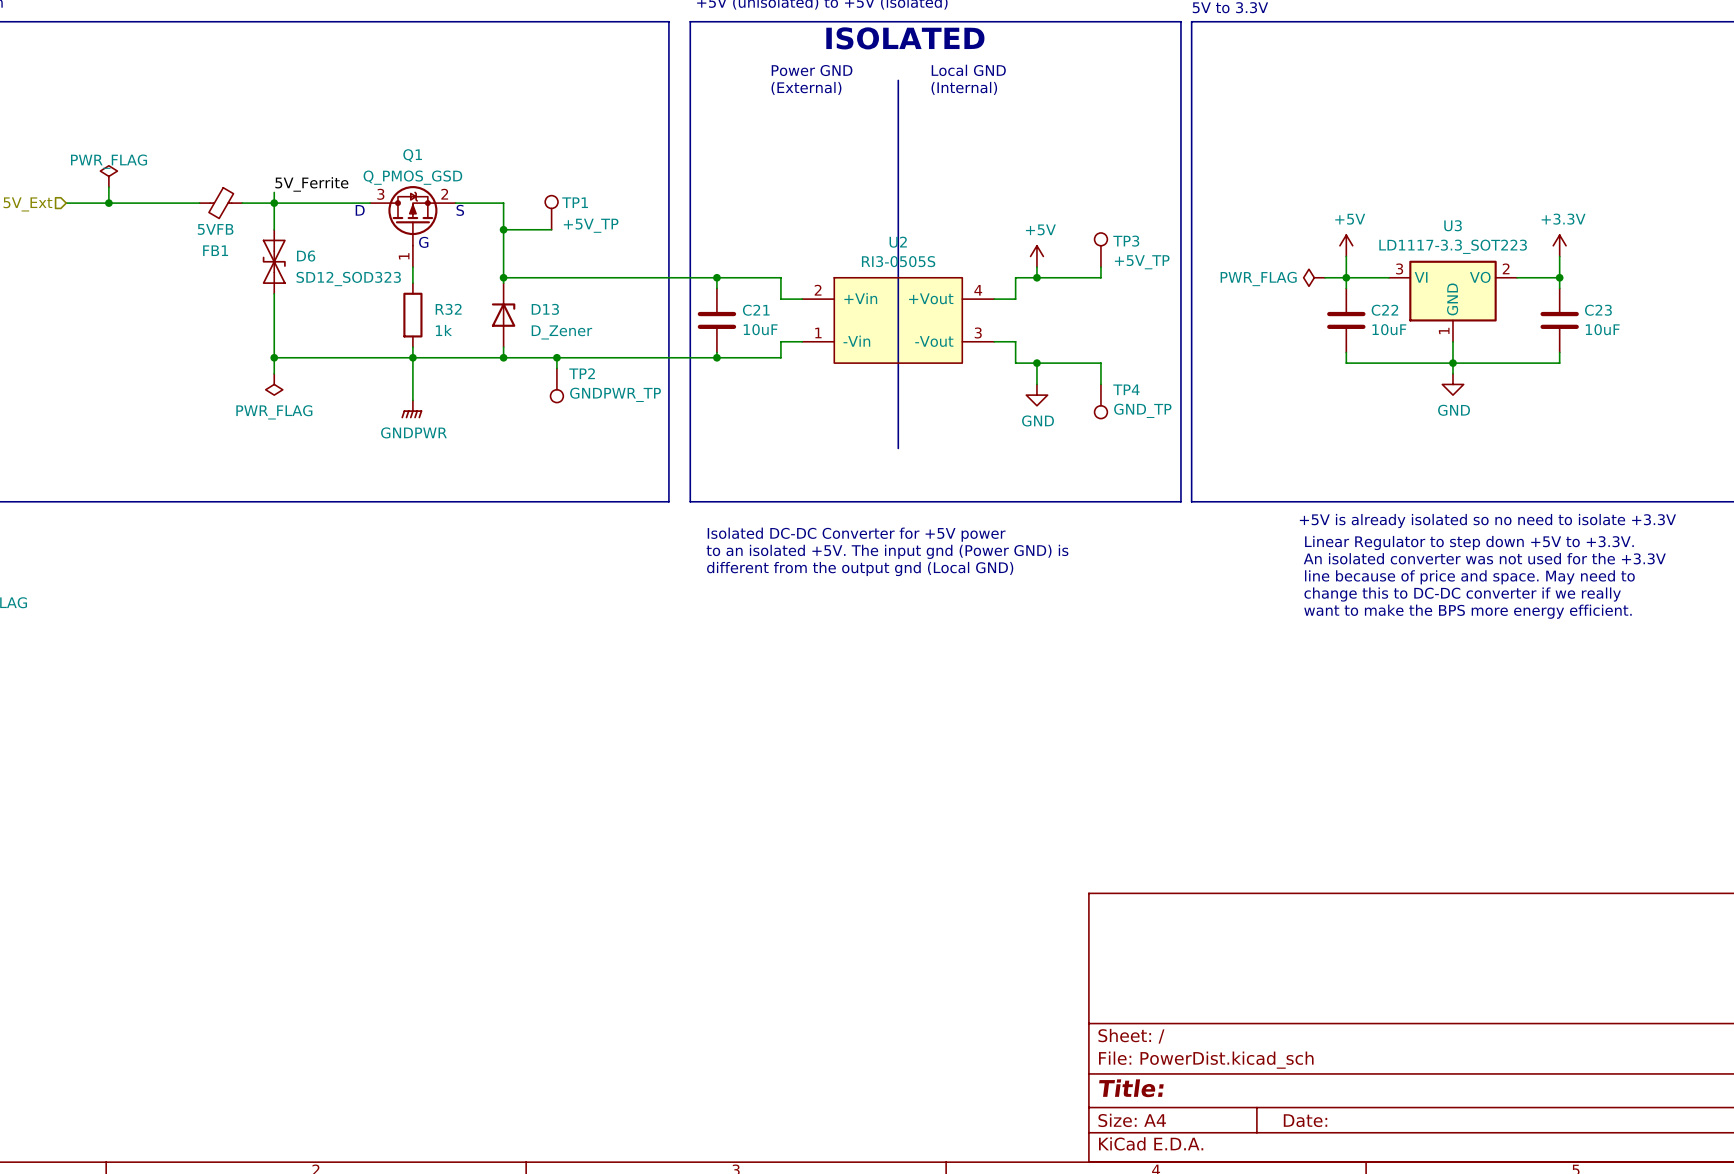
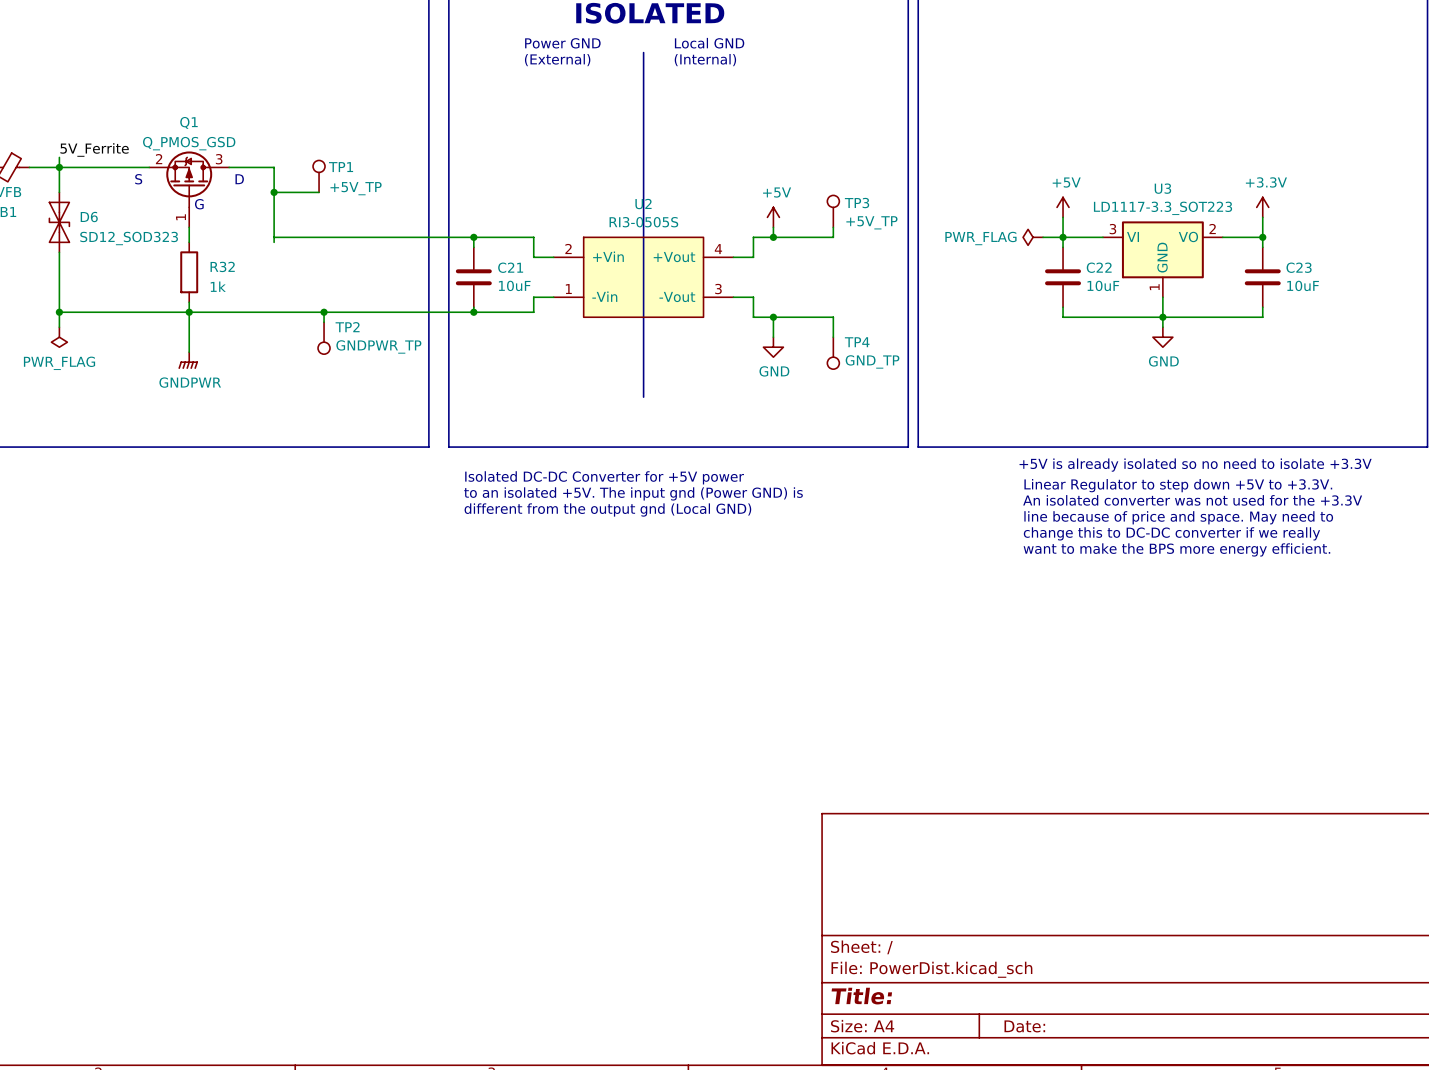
text: D (360, 210) -> S (138, 179)
text: S (460, 210) -> D (239, 179)
Q1 flip: as is (412, 215) -> left-right (189, 179)
junction: (503, 277) -> none
D13: D_Zener (503, 315) -> none
wire: (503, 347) (503, 357) -> none
junction: (503, 357) -> none

